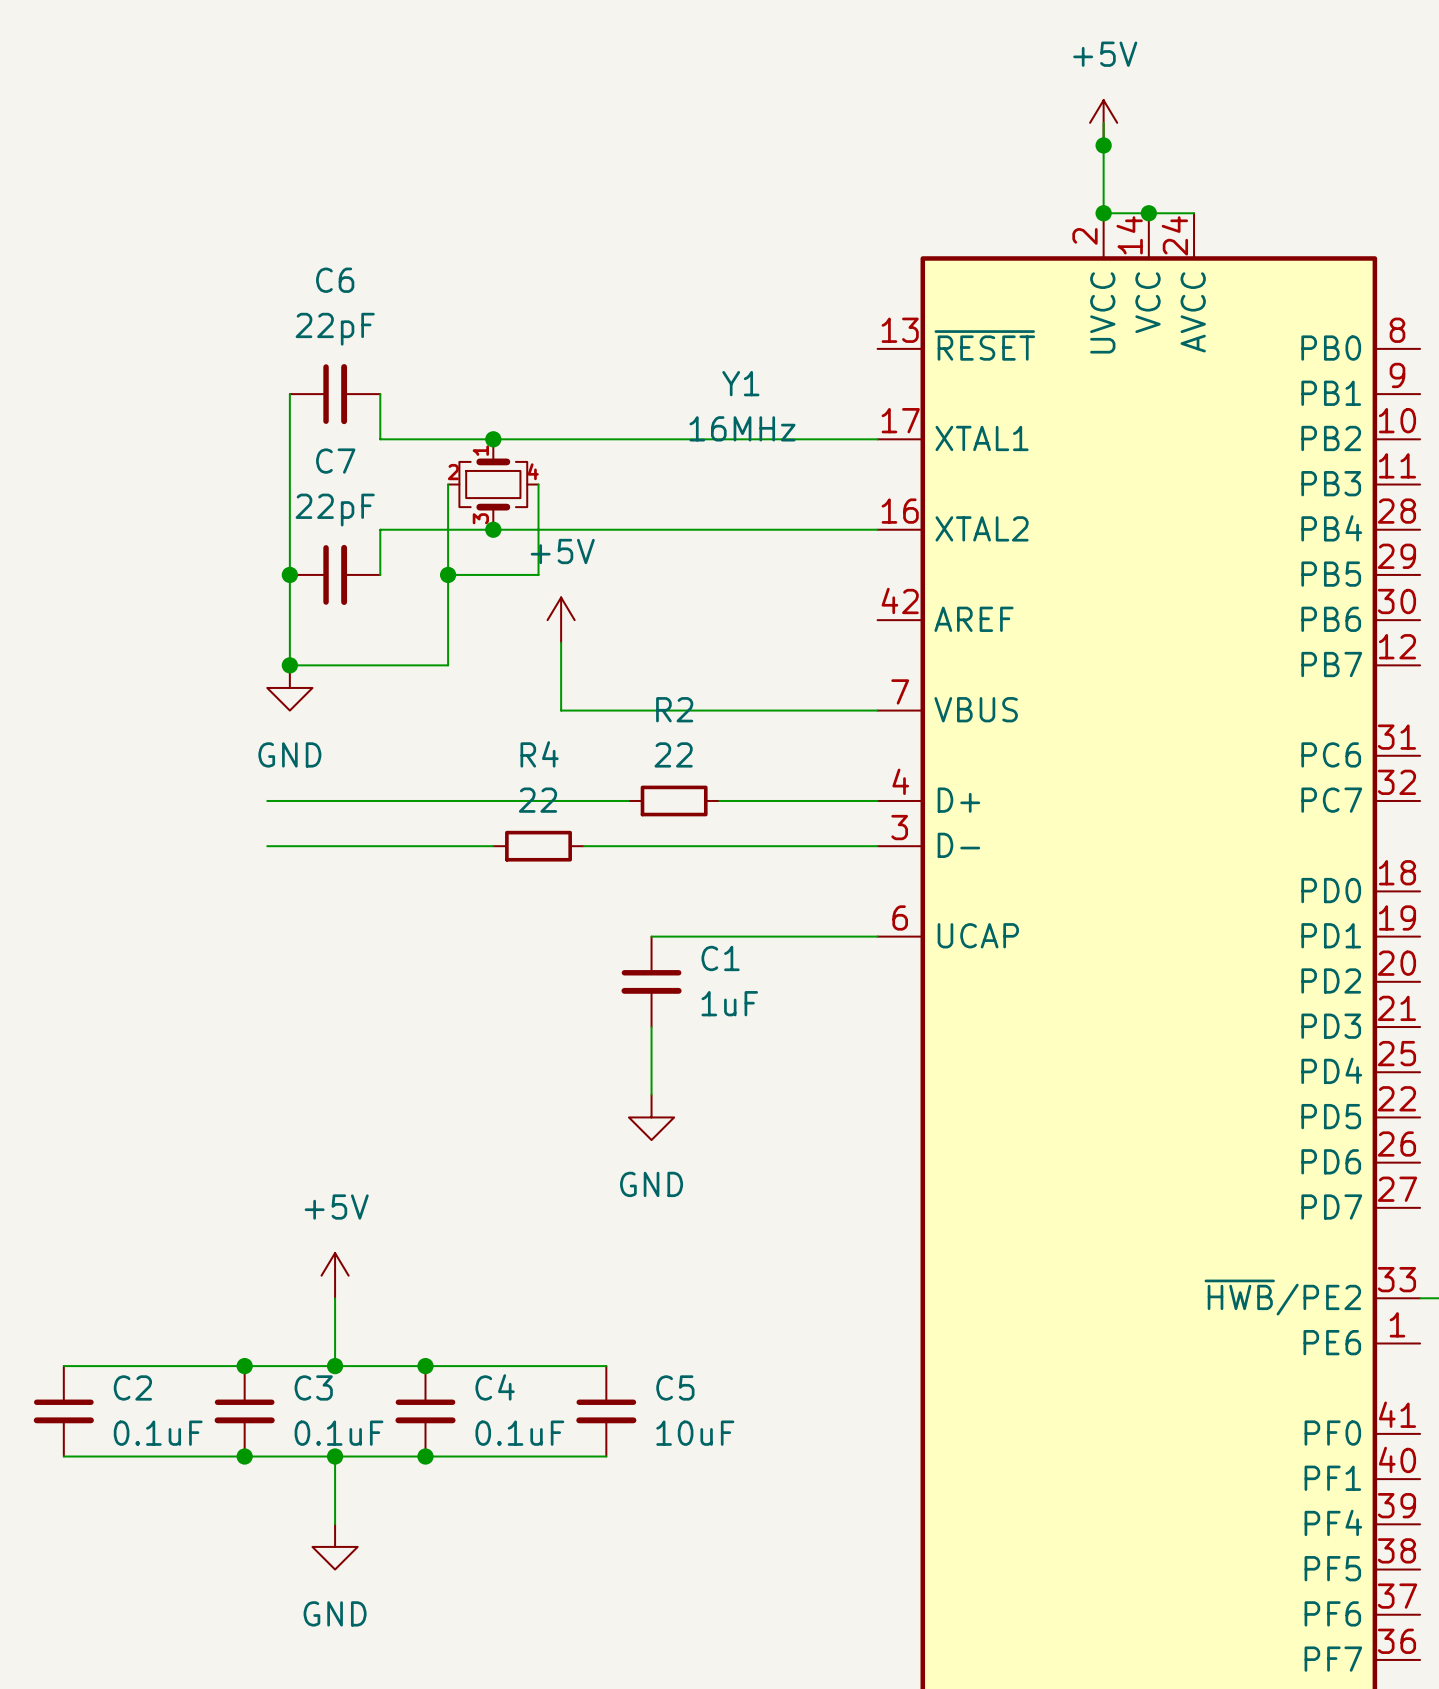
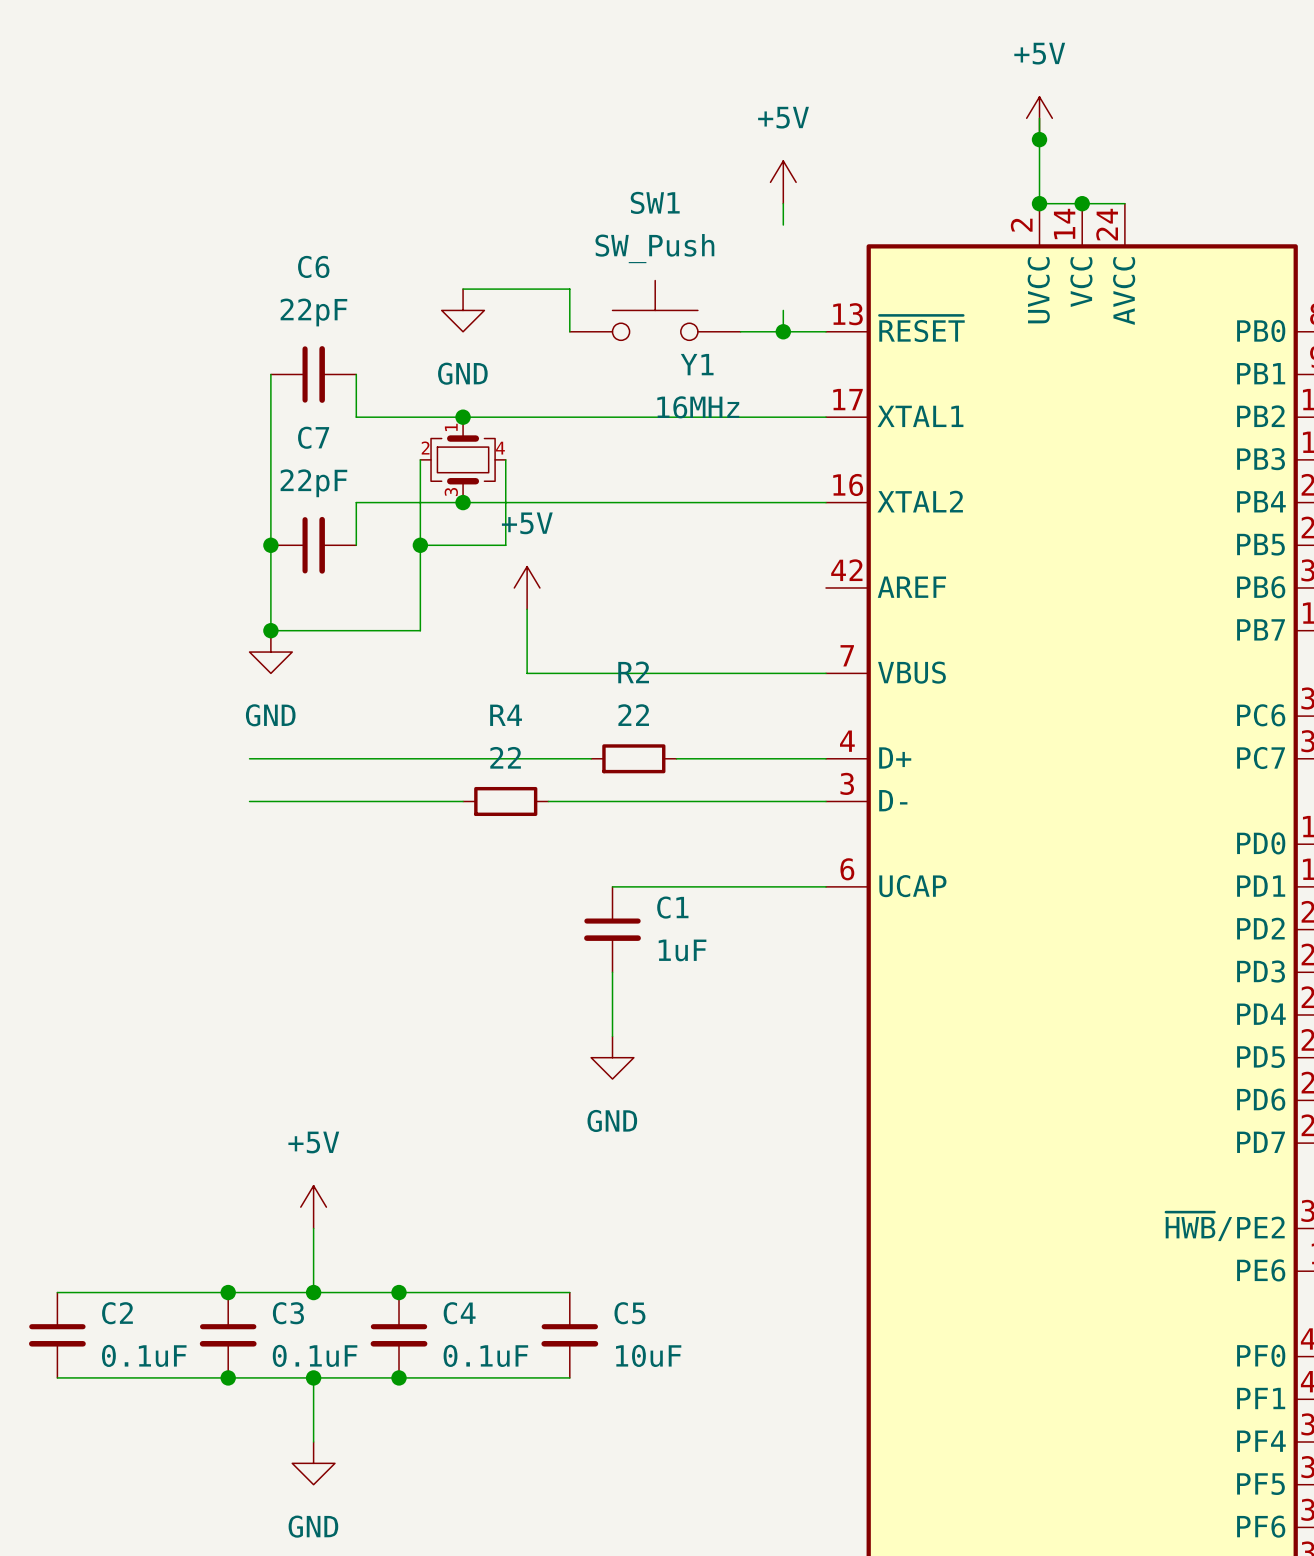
power symbol: none -> +5V (783, 182)
wire: none -> (783, 203) (783, 225)
wire: none -> (463, 289) (569, 289) (569, 331)
power symbol: none -> GND (463, 310)
SW1: none -> SW_Push (655, 310)
wire: none -> (783, 310) (783, 331)
wire: none -> (740, 331) (826, 331)
junction: none -> (783, 331)

